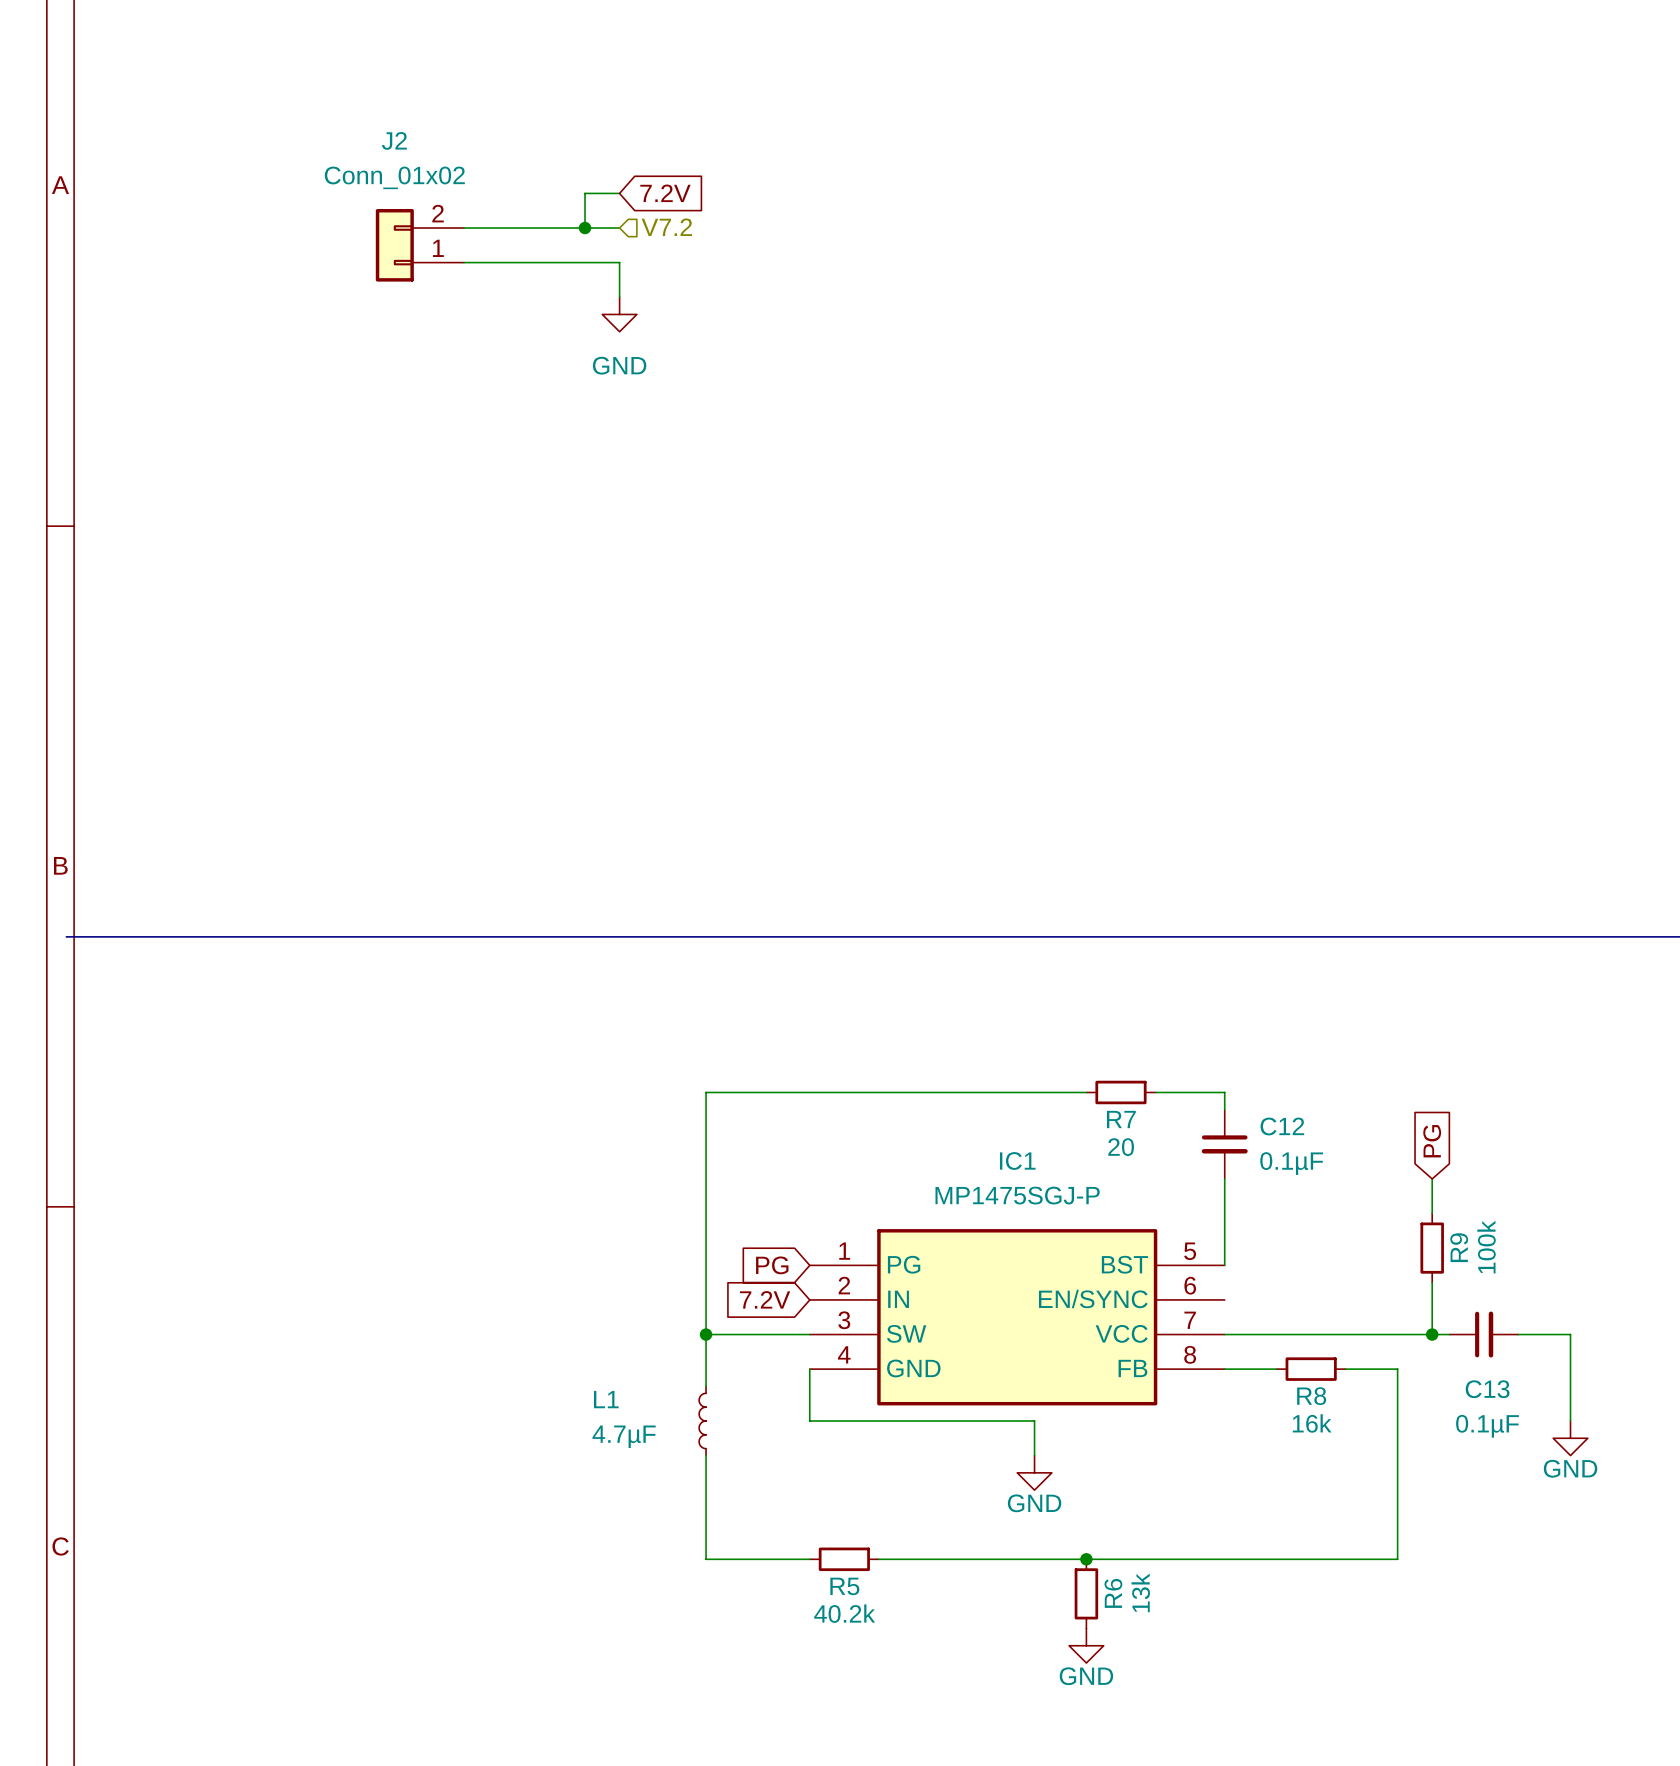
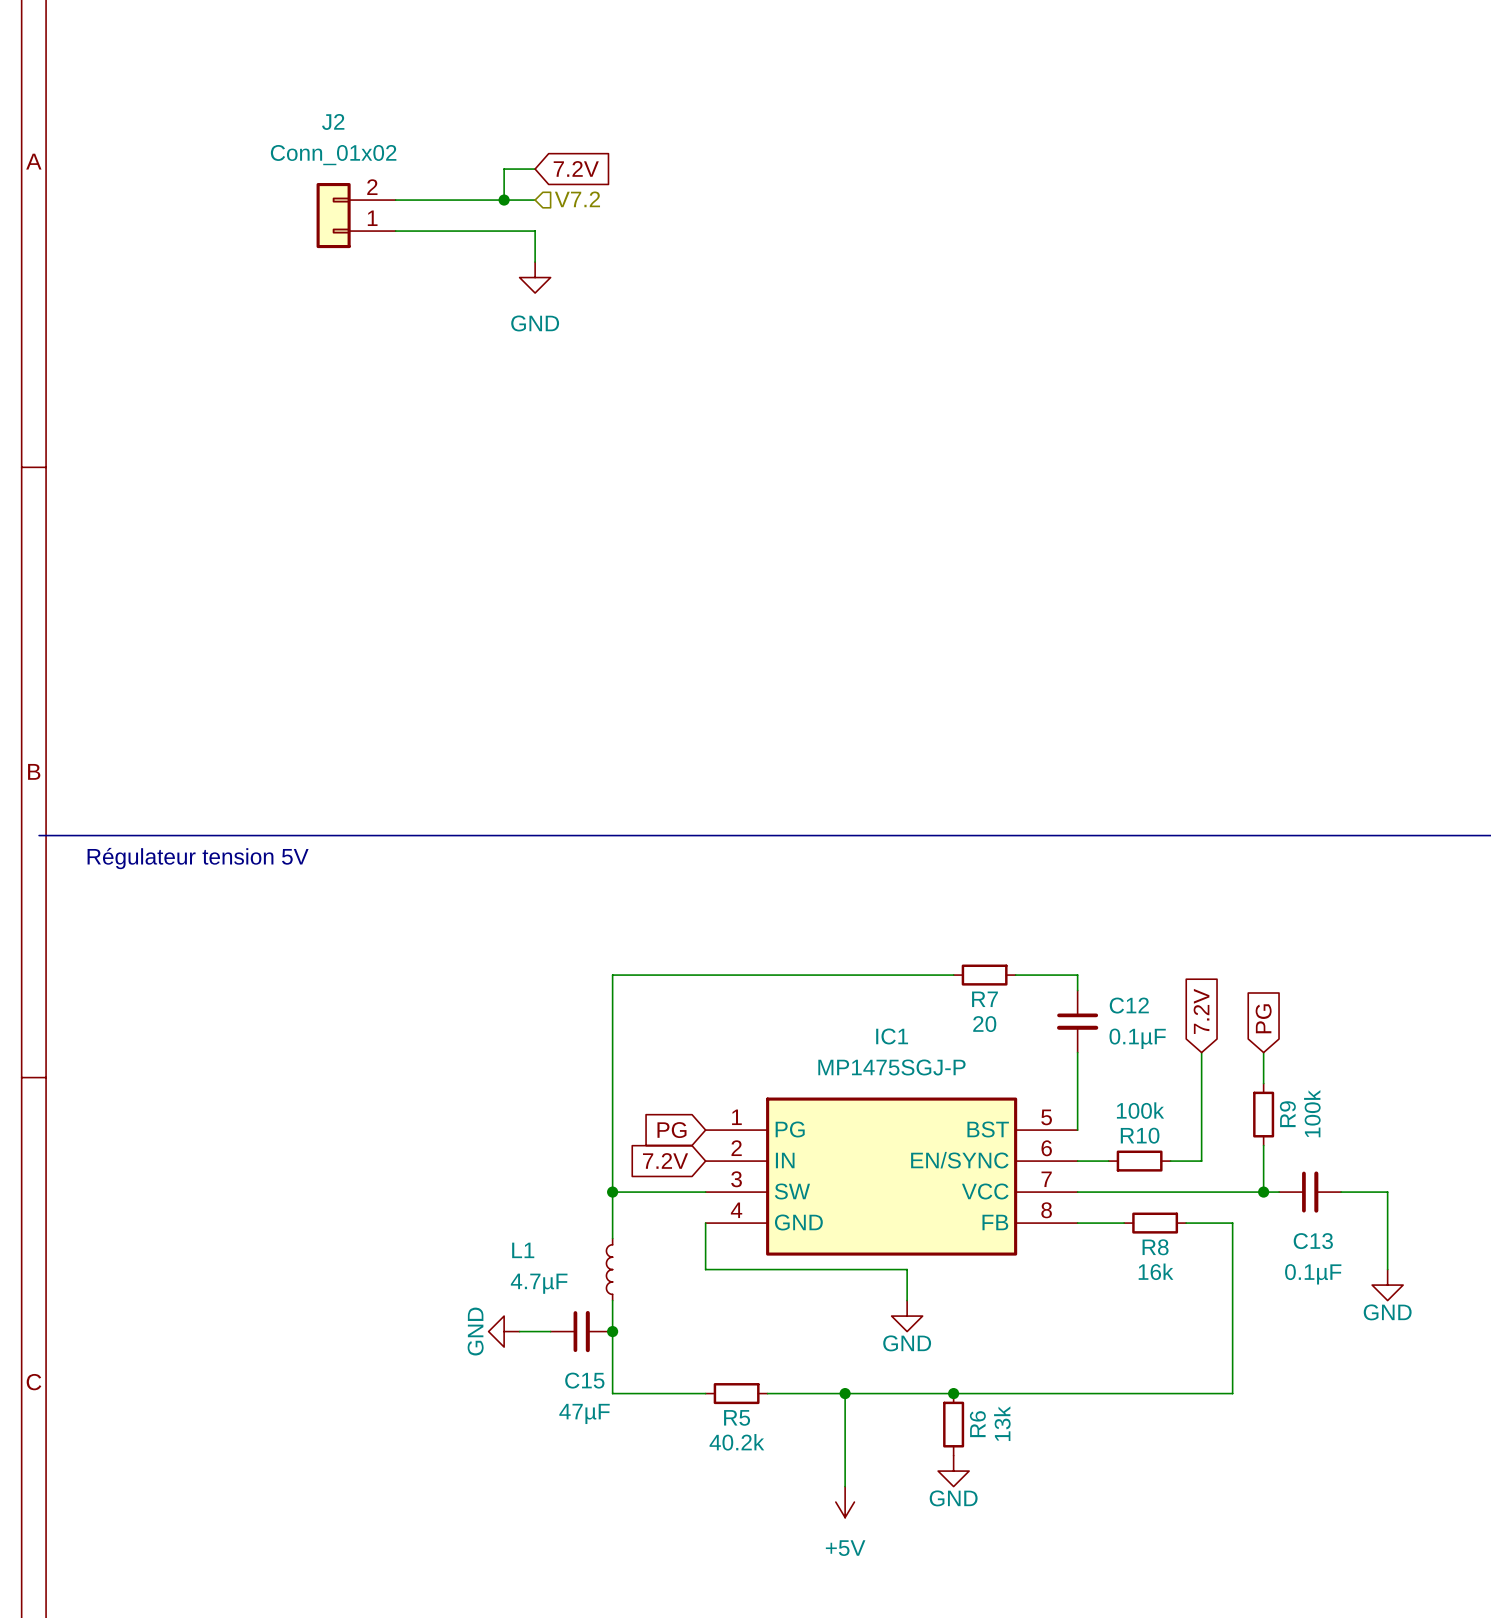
text: none -> Régulateur tension 5V (198, 858)
global label: none -> 7.2V (1201, 1011)
wire: none -> (1201, 1052) (1201, 1161) (1170, 1161)
wire: none -> (1077, 1161) (1108, 1161)
R10: none -> 100k (1139, 1161)
power symbol: none -> GND (504, 1331)
wire: none -> (519, 1331) (550, 1331)
C15: none -> 47µF (581, 1331)
junction: none -> (612, 1331)
wire: none -> (845, 1393) (845, 1486)
junction: none -> (845, 1393)
power symbol: none -> +5V (845, 1502)

